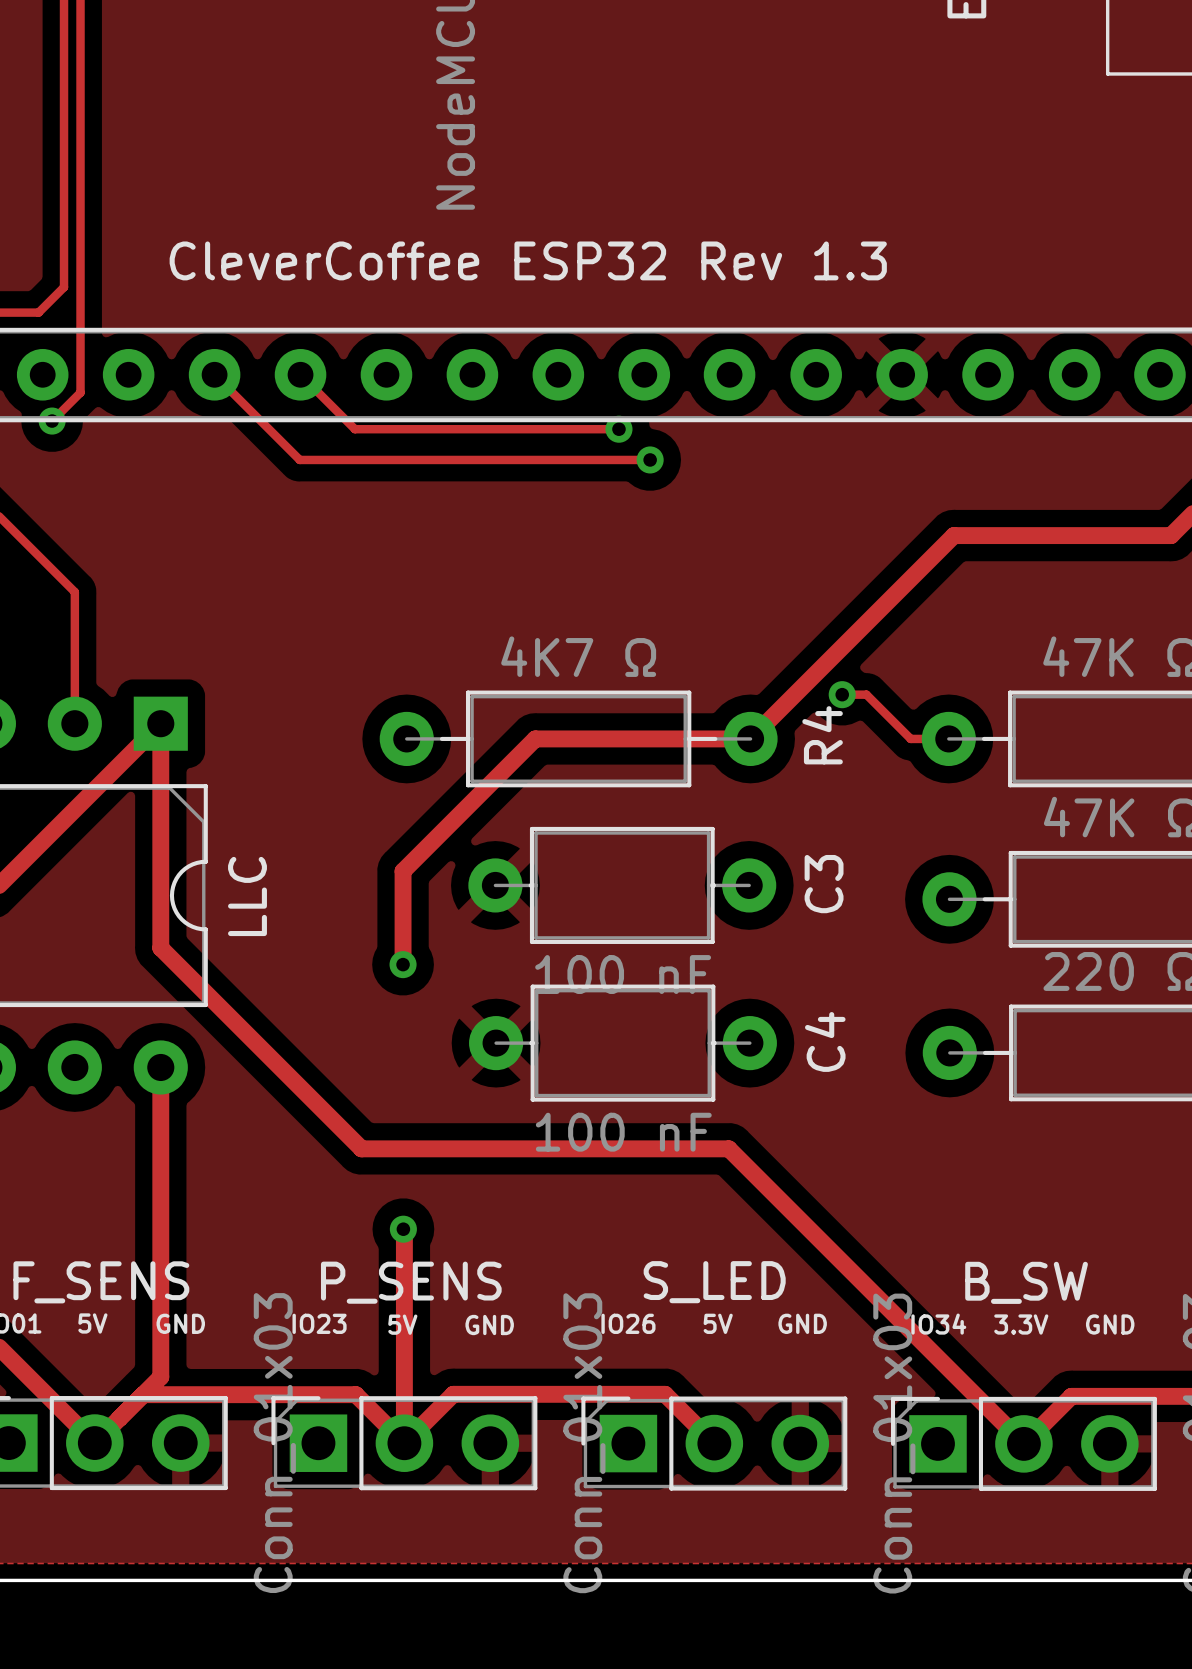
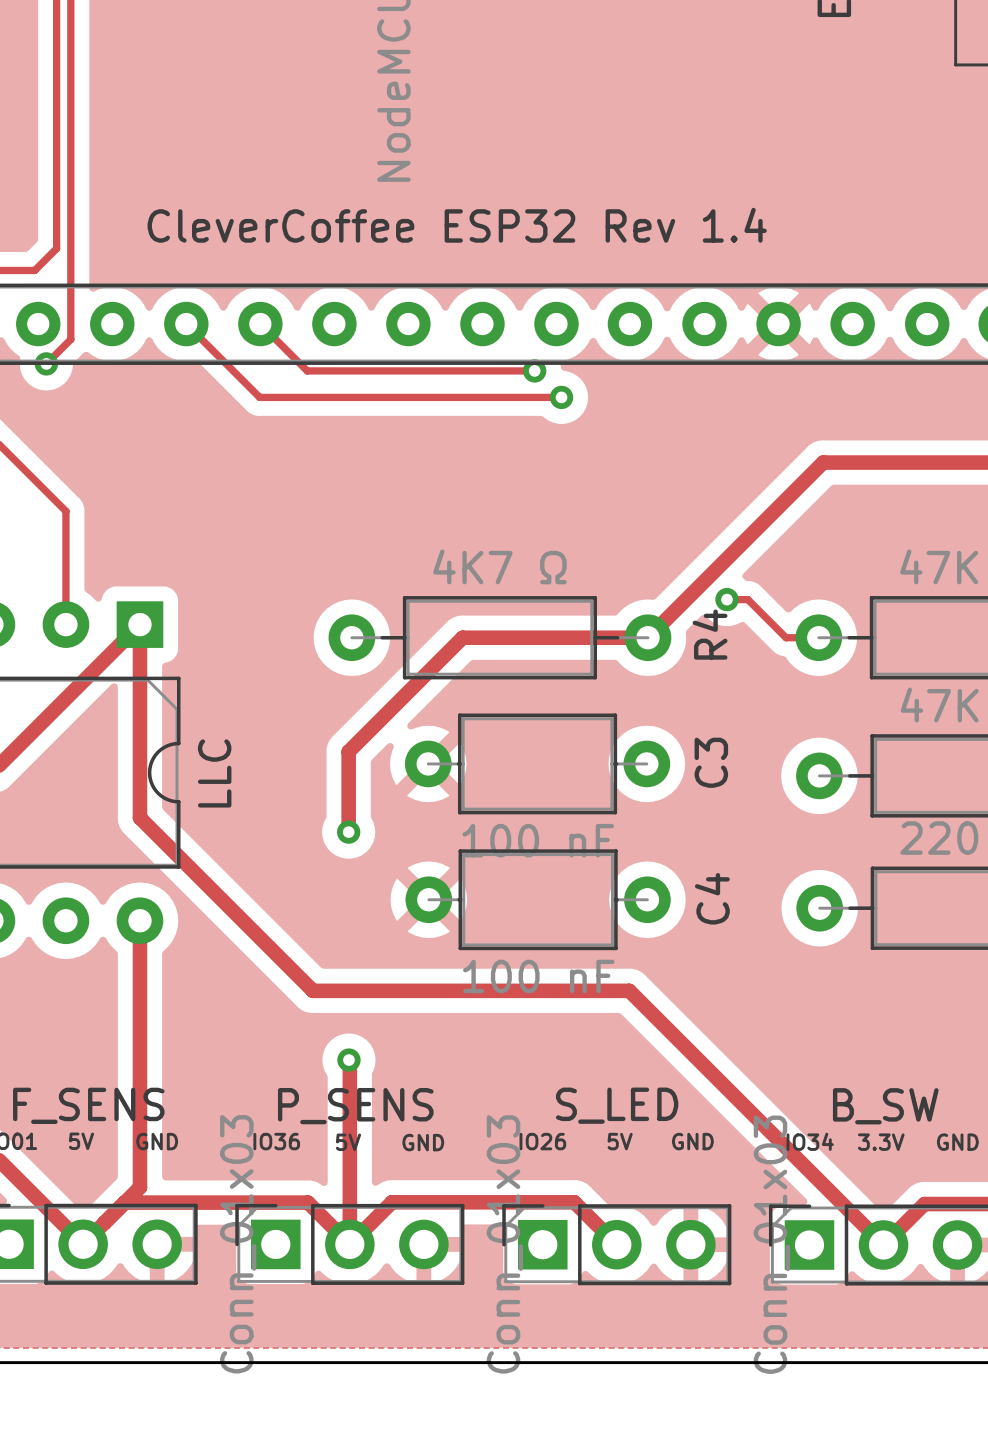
text: CleverCoffee ESP32 Rev 1.3 (528, 260) -> CleverCoffee ESP32 Rev 1.4 (457, 225)
text: IO23 (319, 1323) -> IO36 (276, 1141)

